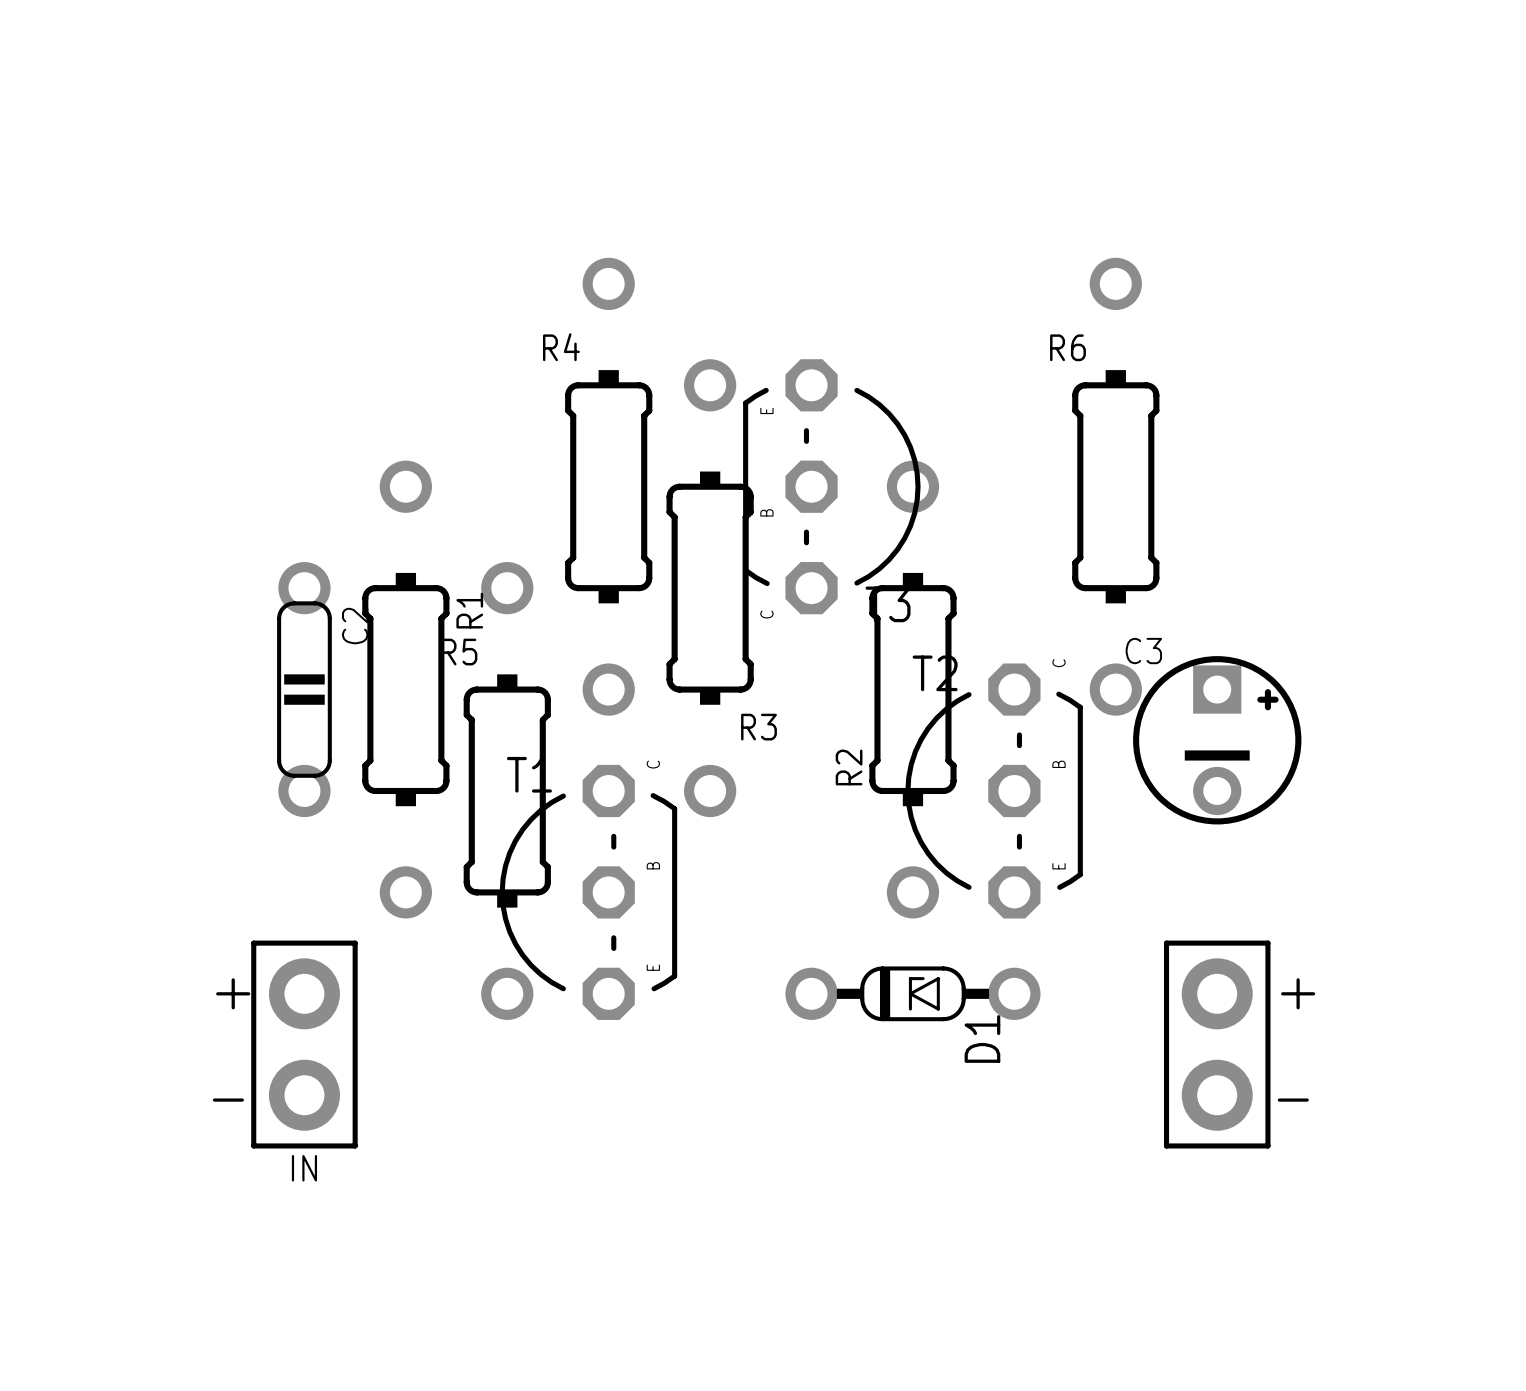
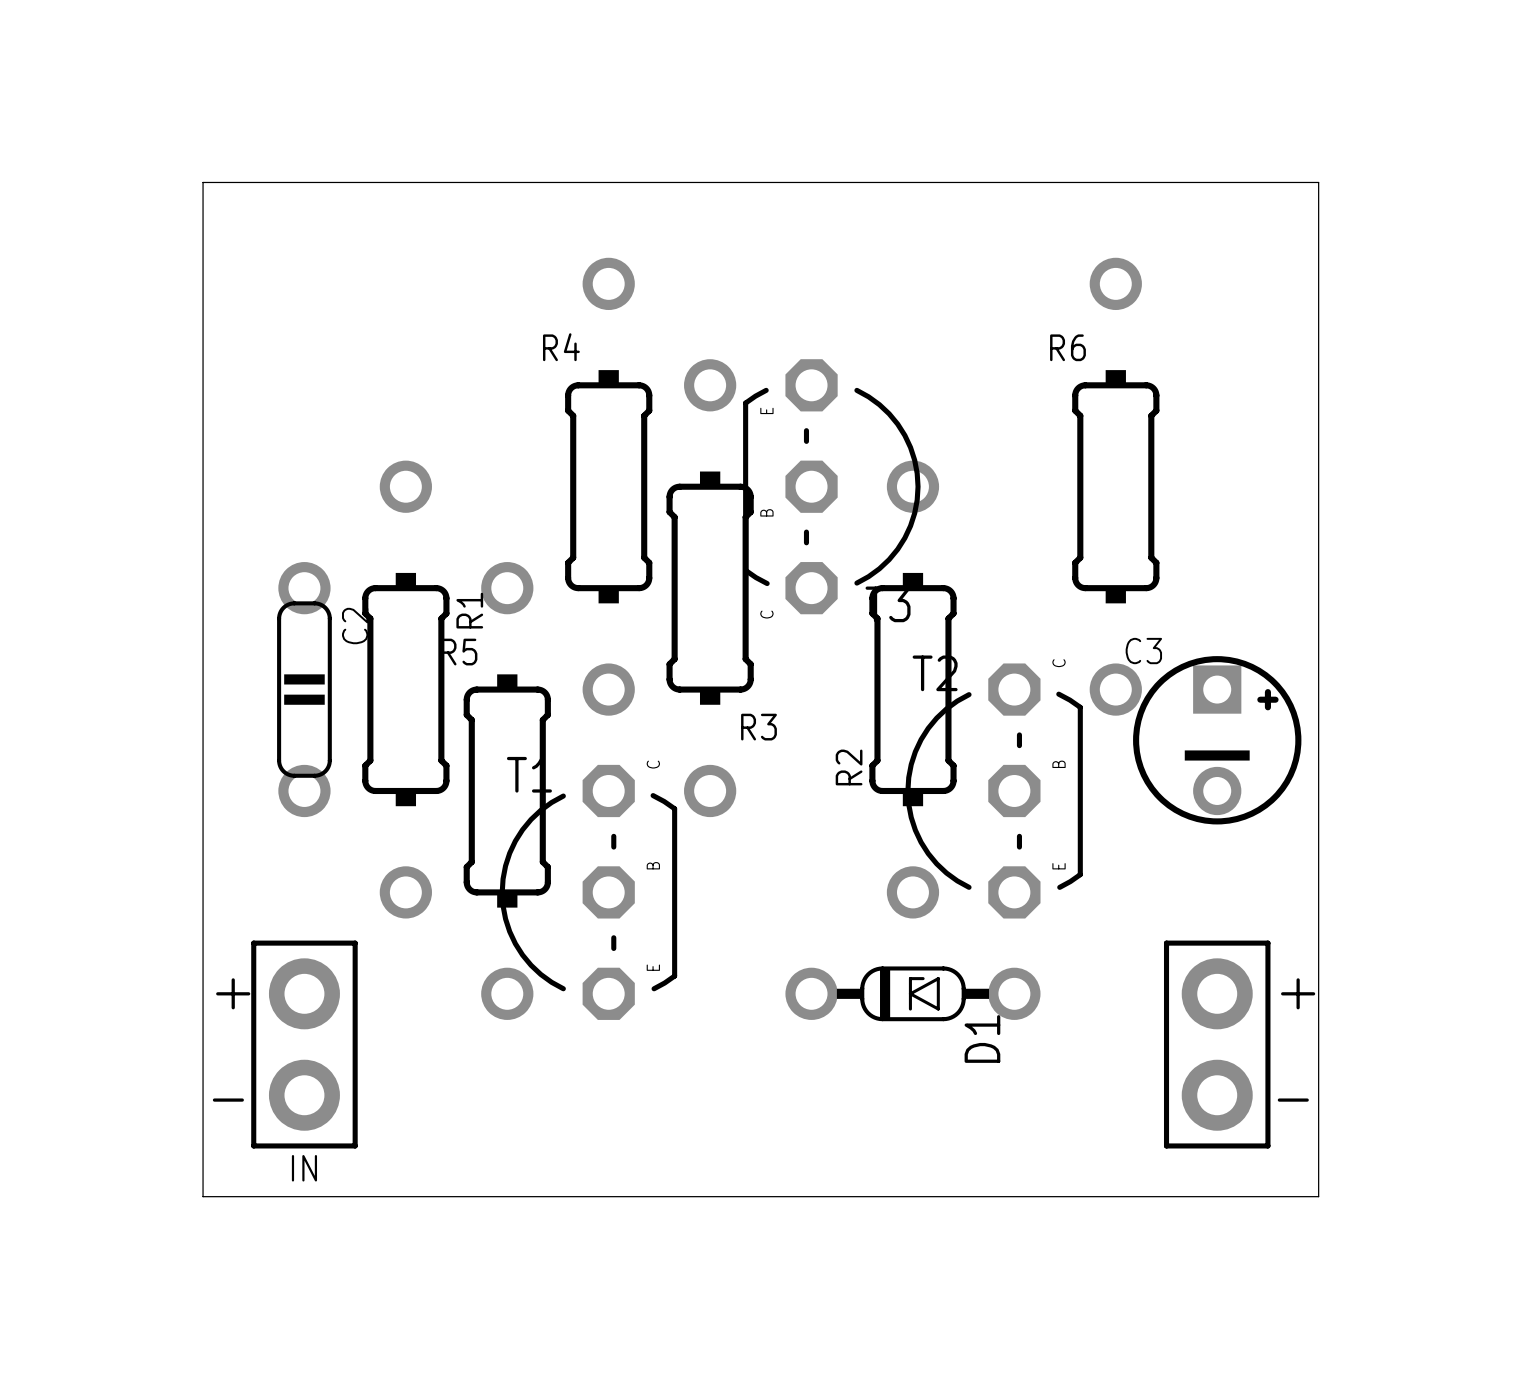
board edge: none -> (203, 182) (1318, 182) (1318, 1196) (203, 1196) (203, 182)

